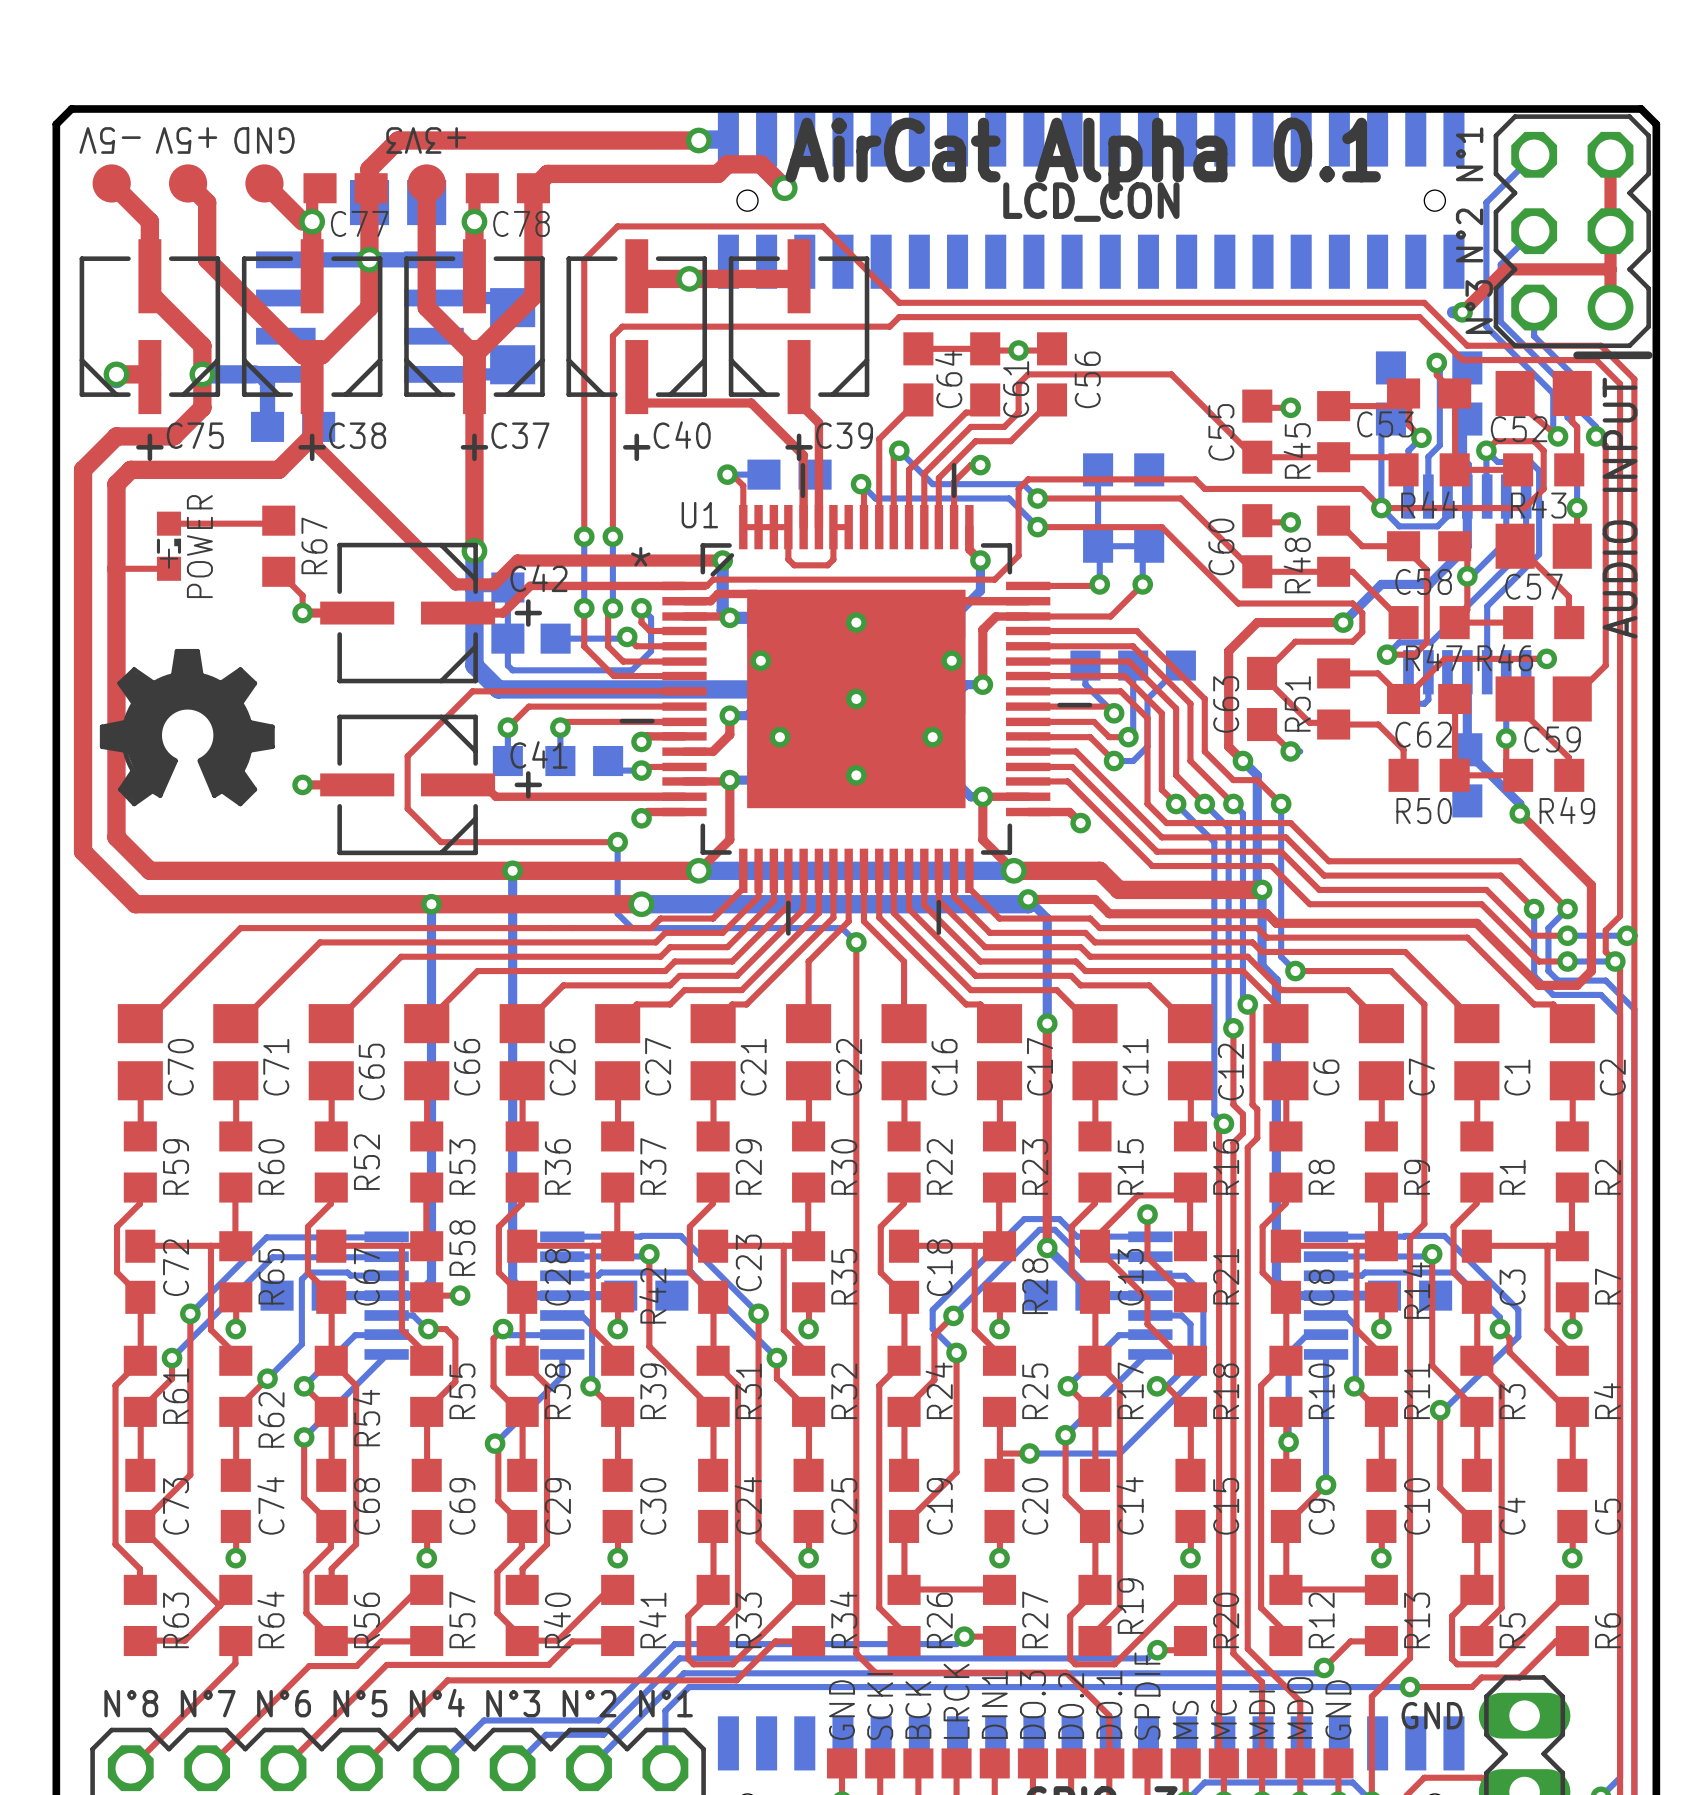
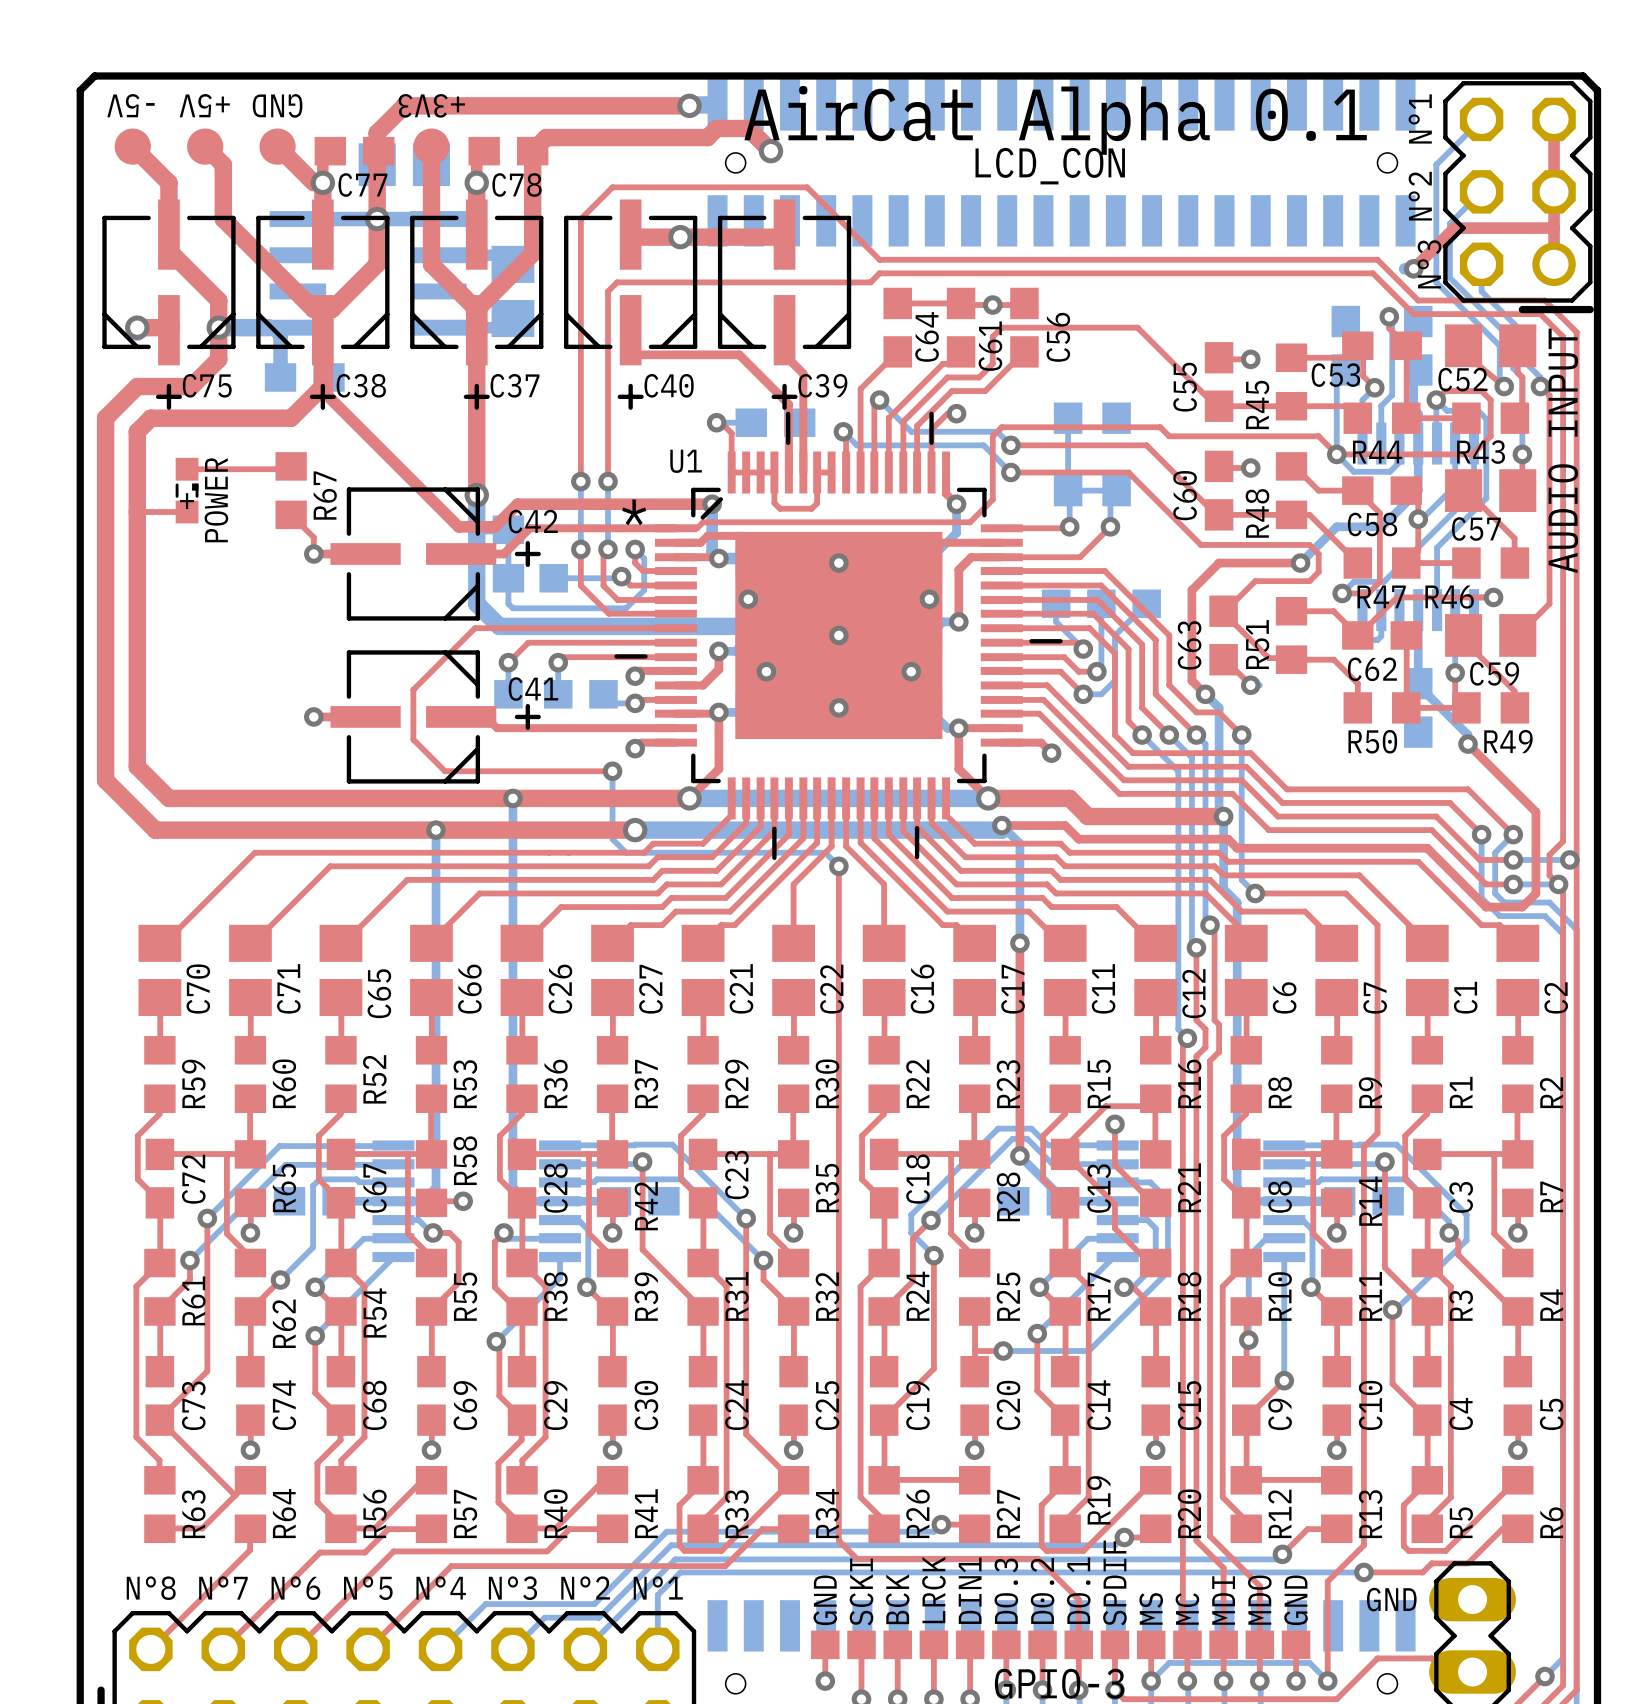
drawing: [99, 648, 275, 807] -> none

